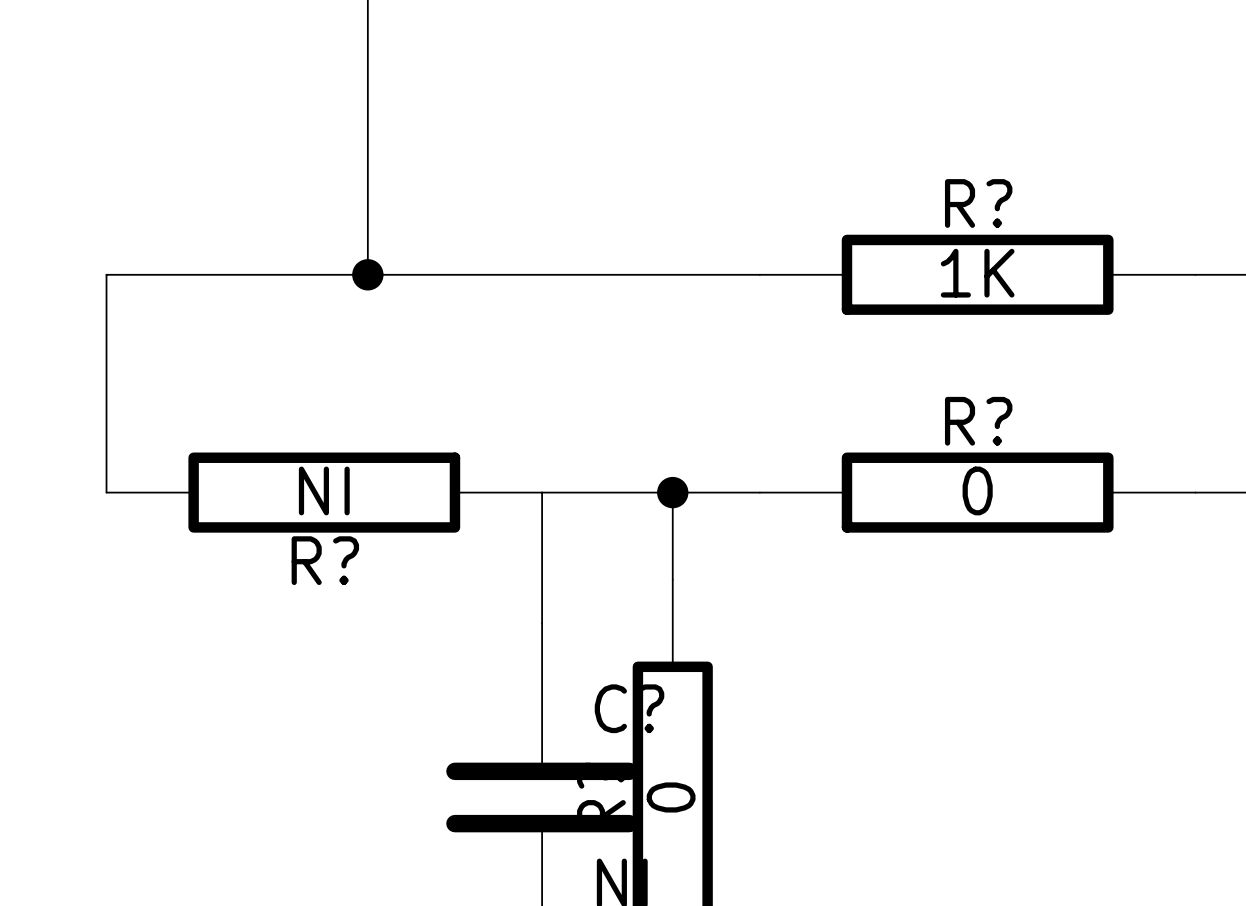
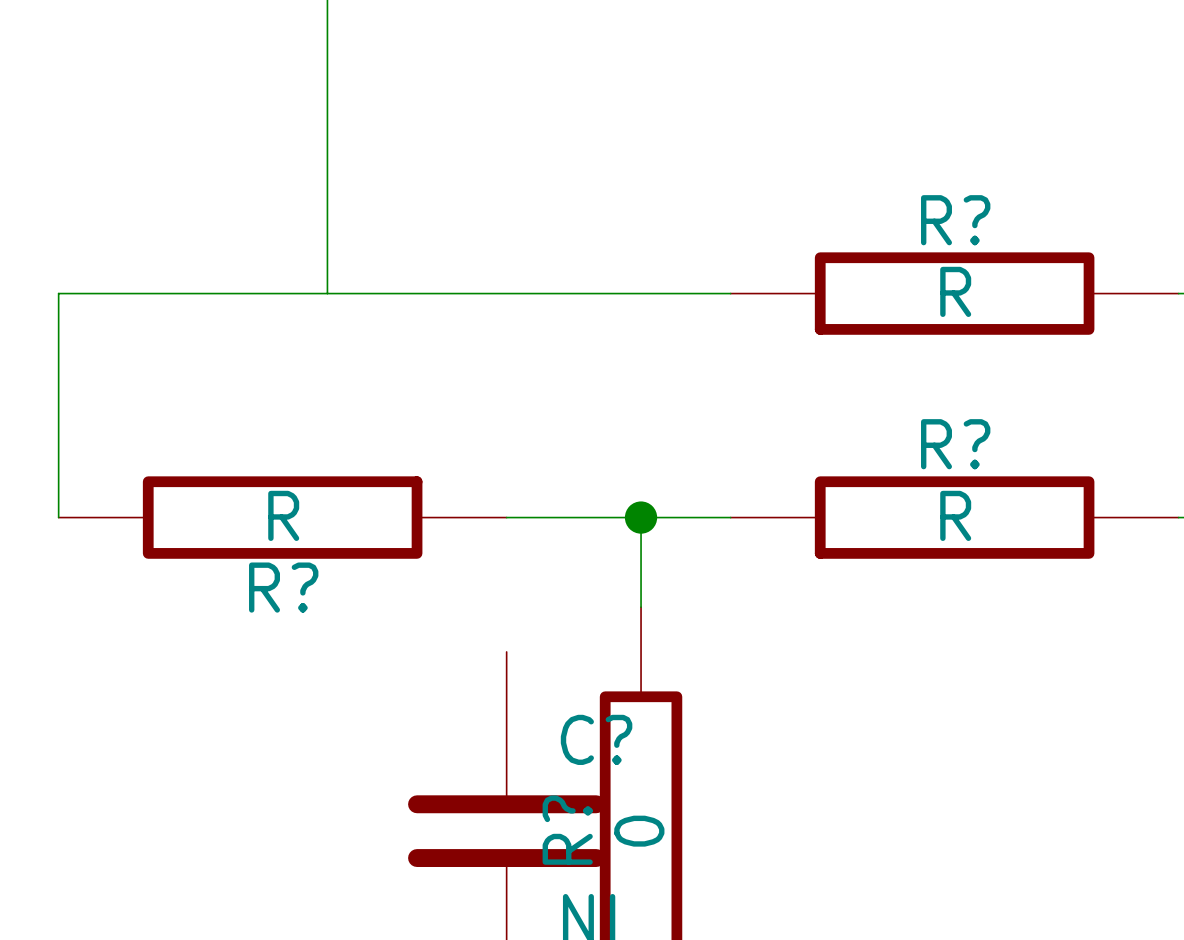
R? value: 1K (977, 273) -> R (955, 291)
junction: (367, 274) -> none
R? value: NI (324, 490) -> R (283, 515)
R? value: 0 (977, 490) -> R (955, 515)
wire: (542, 492) (542, 623) -> none

